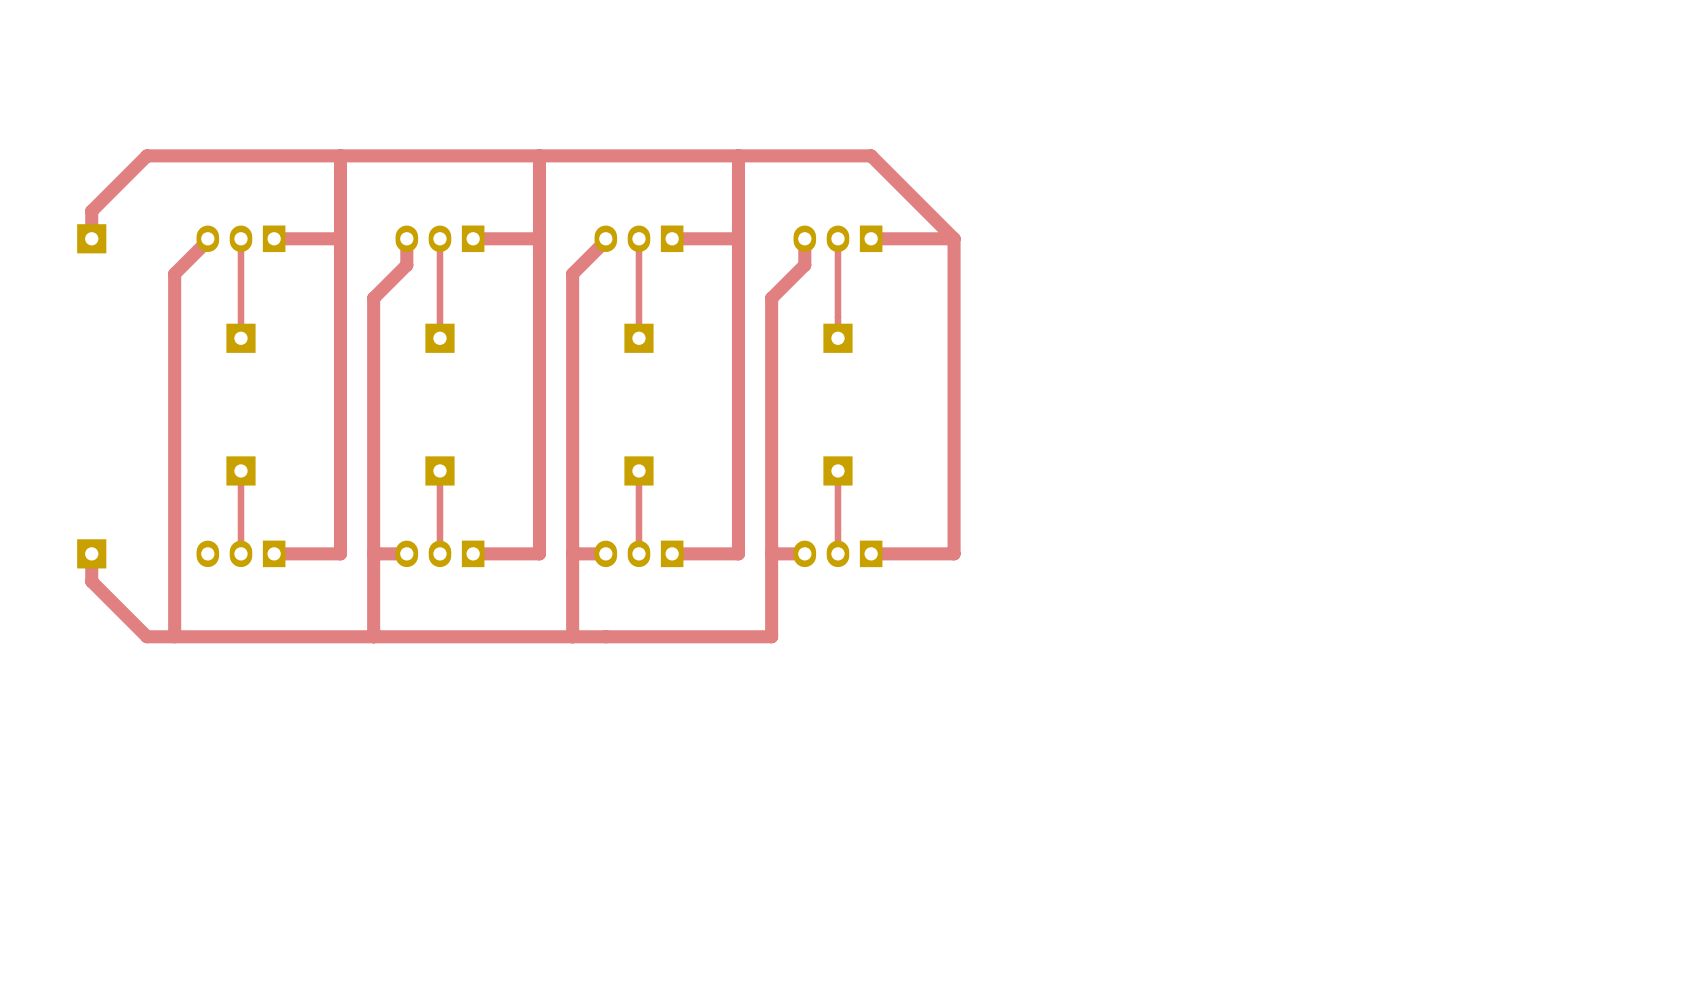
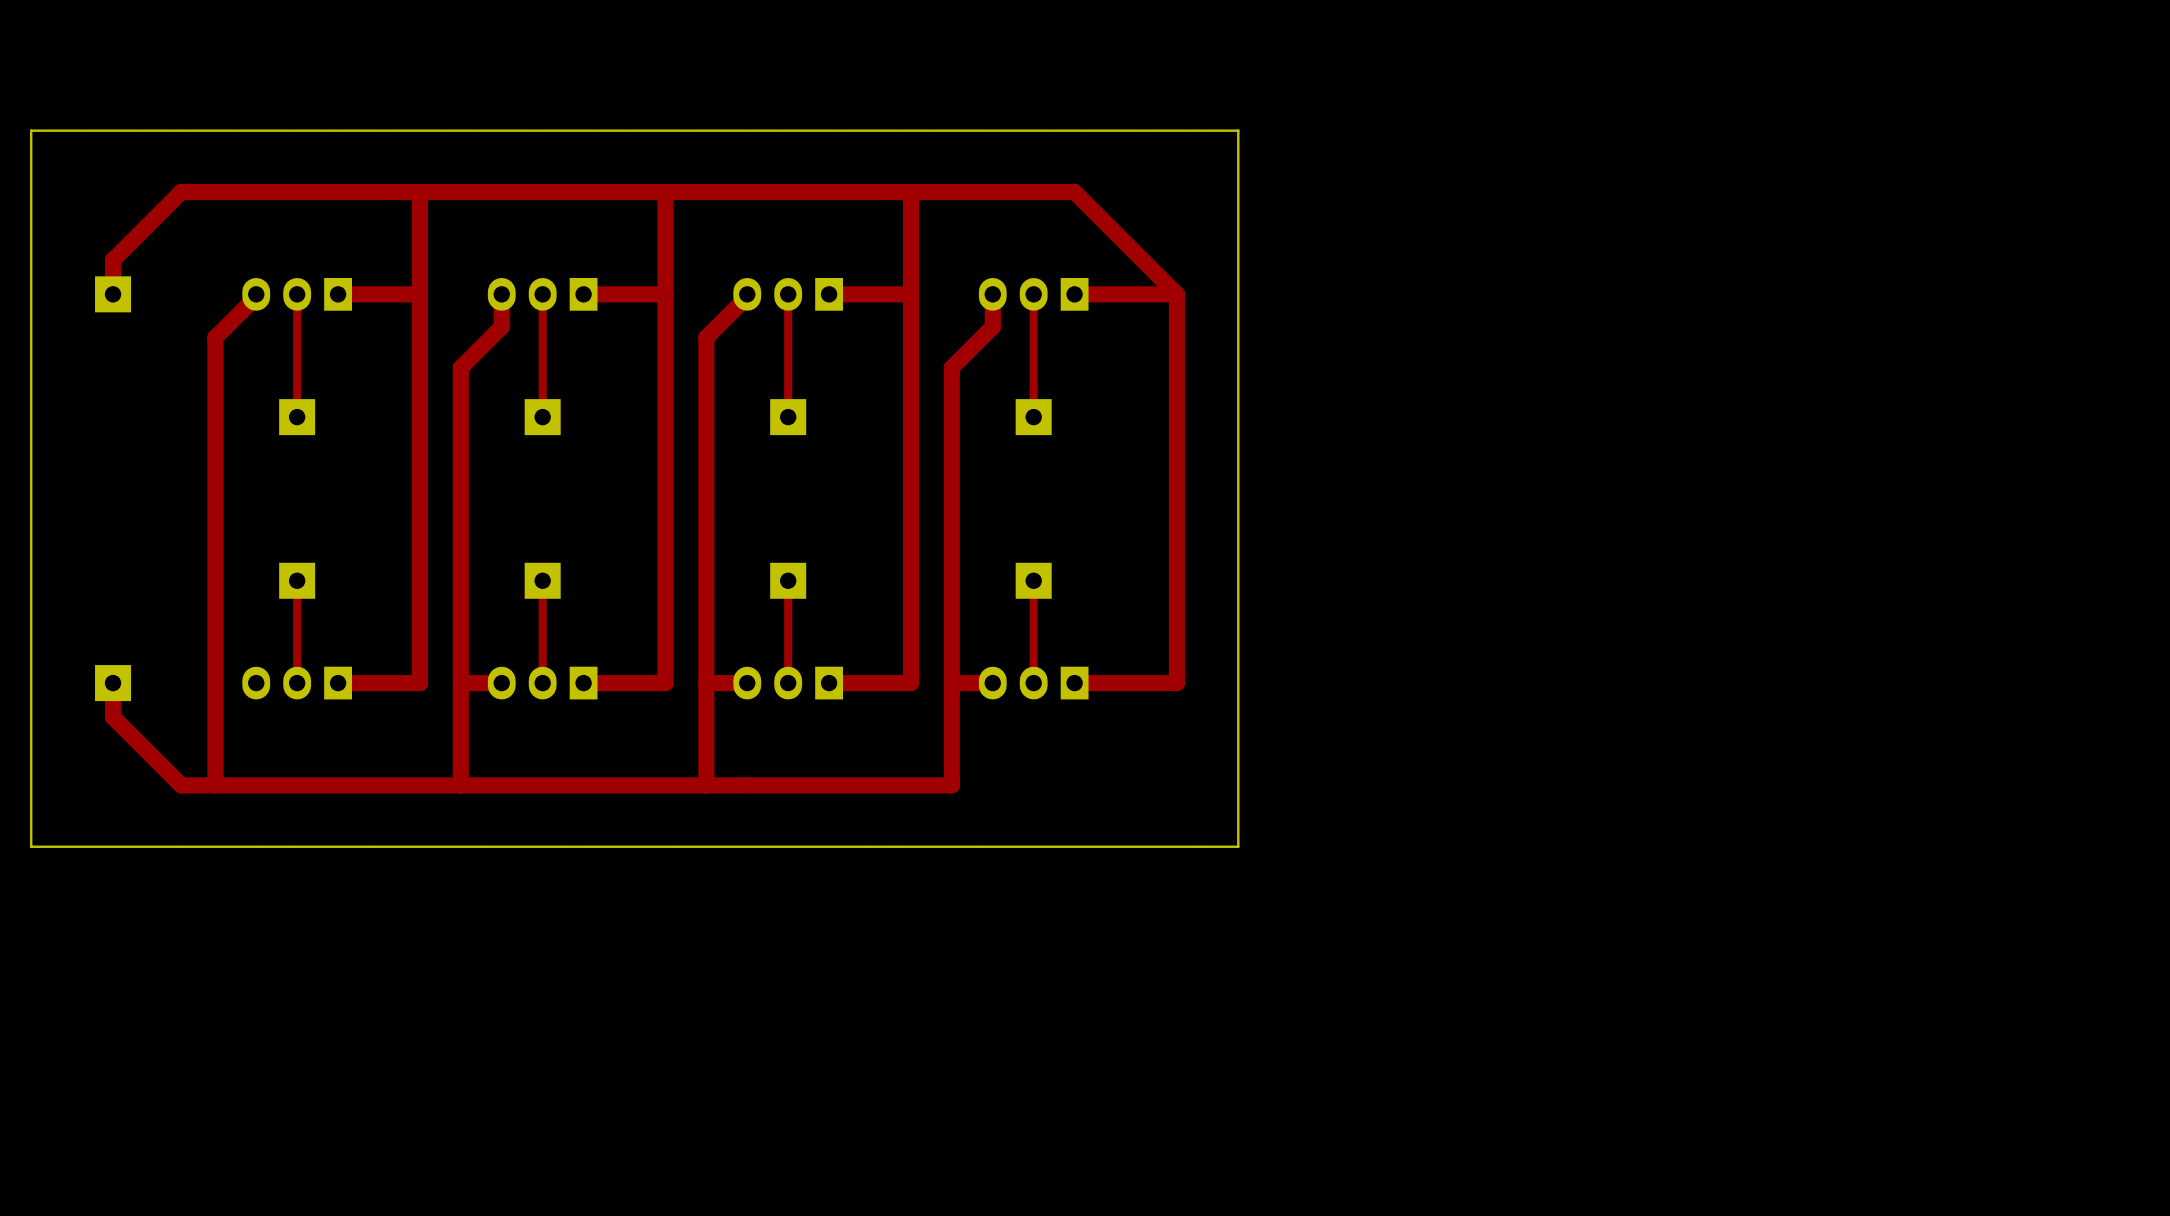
board edge: none -> (1238, 130) (1238, 846) (31, 846) (31, 130) (1238, 130)

